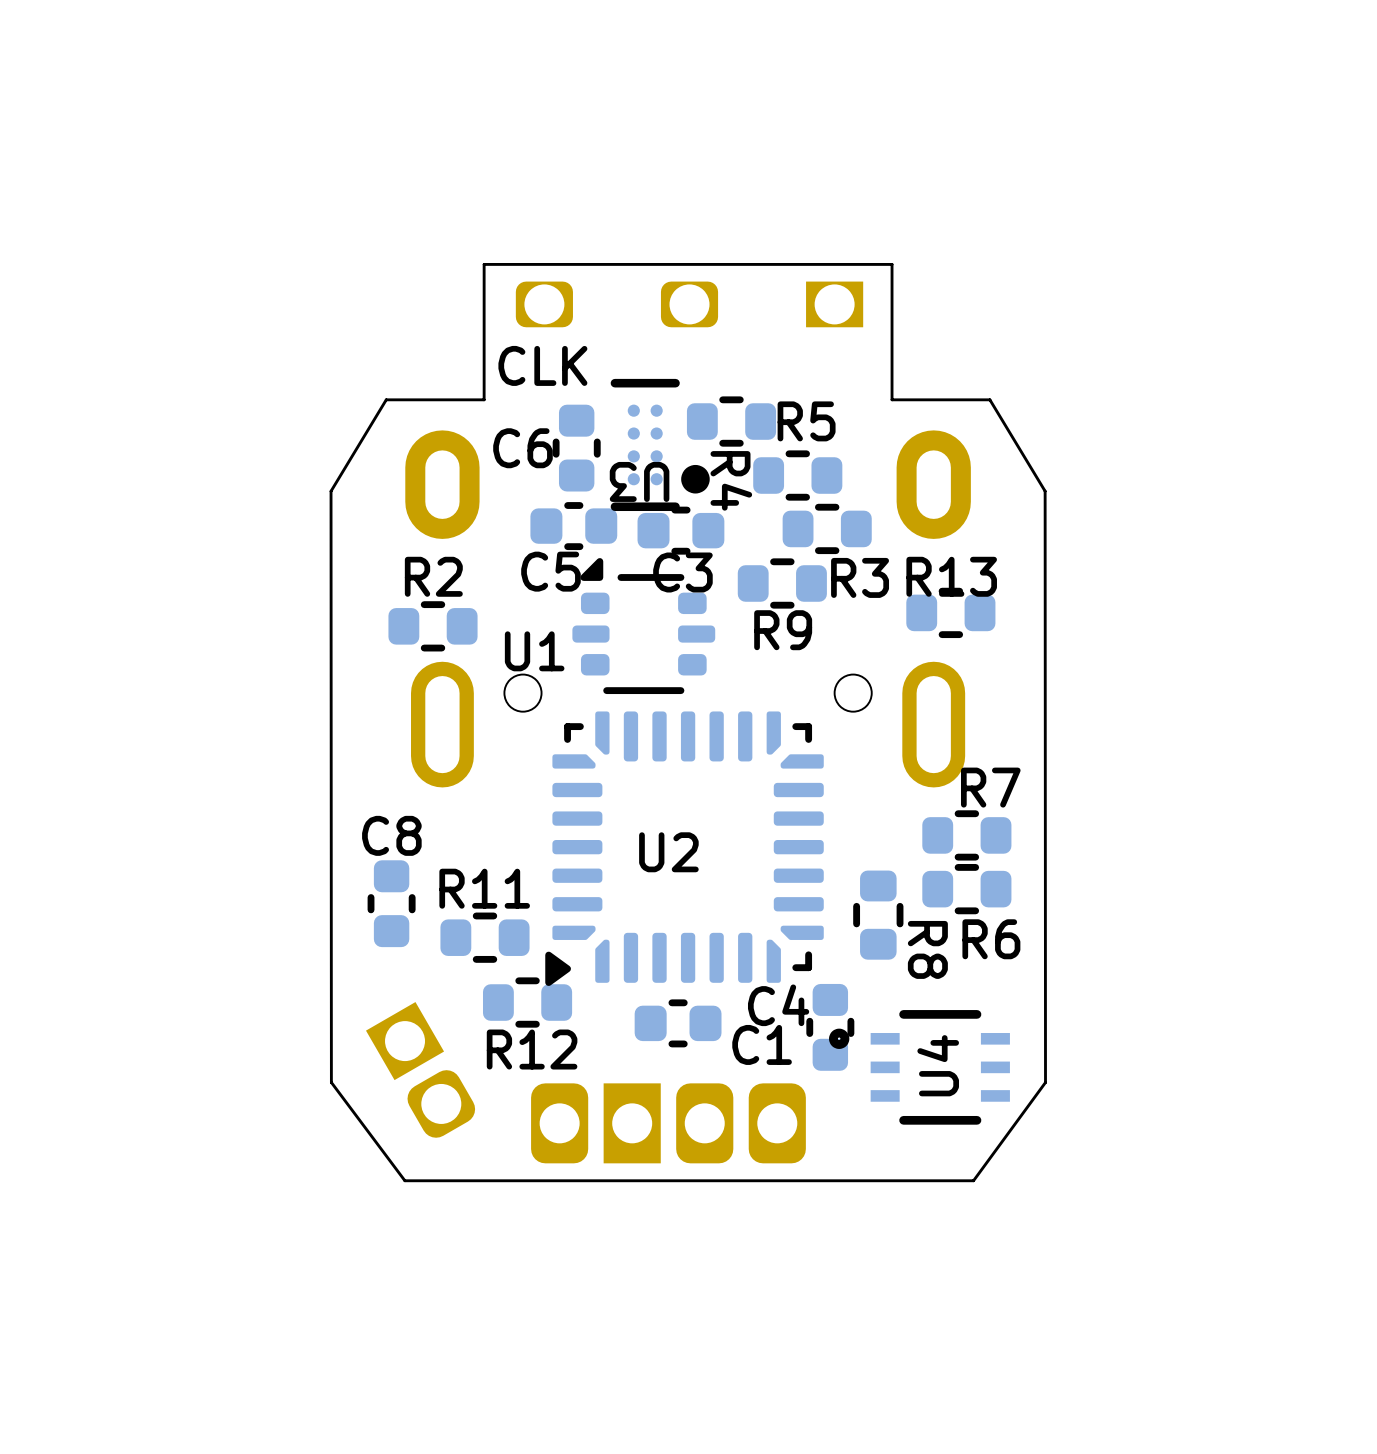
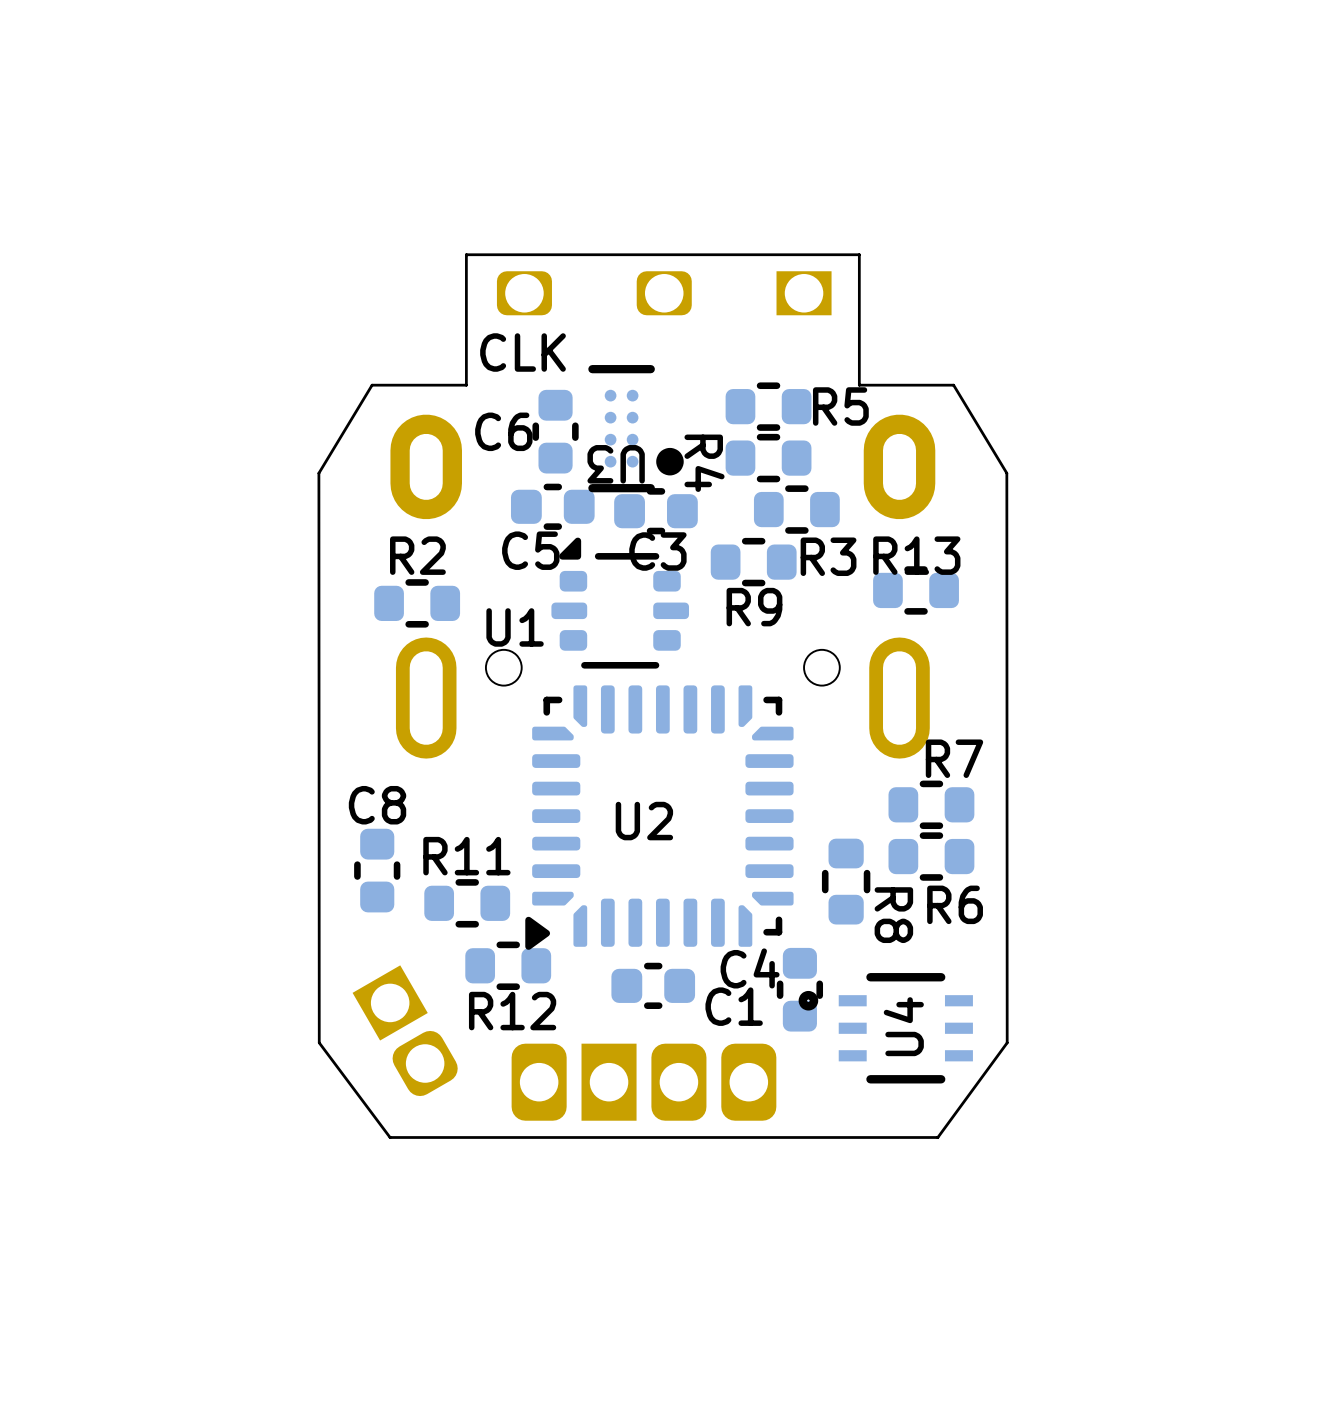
R5 position: (731, 421) -> (768, 406)

